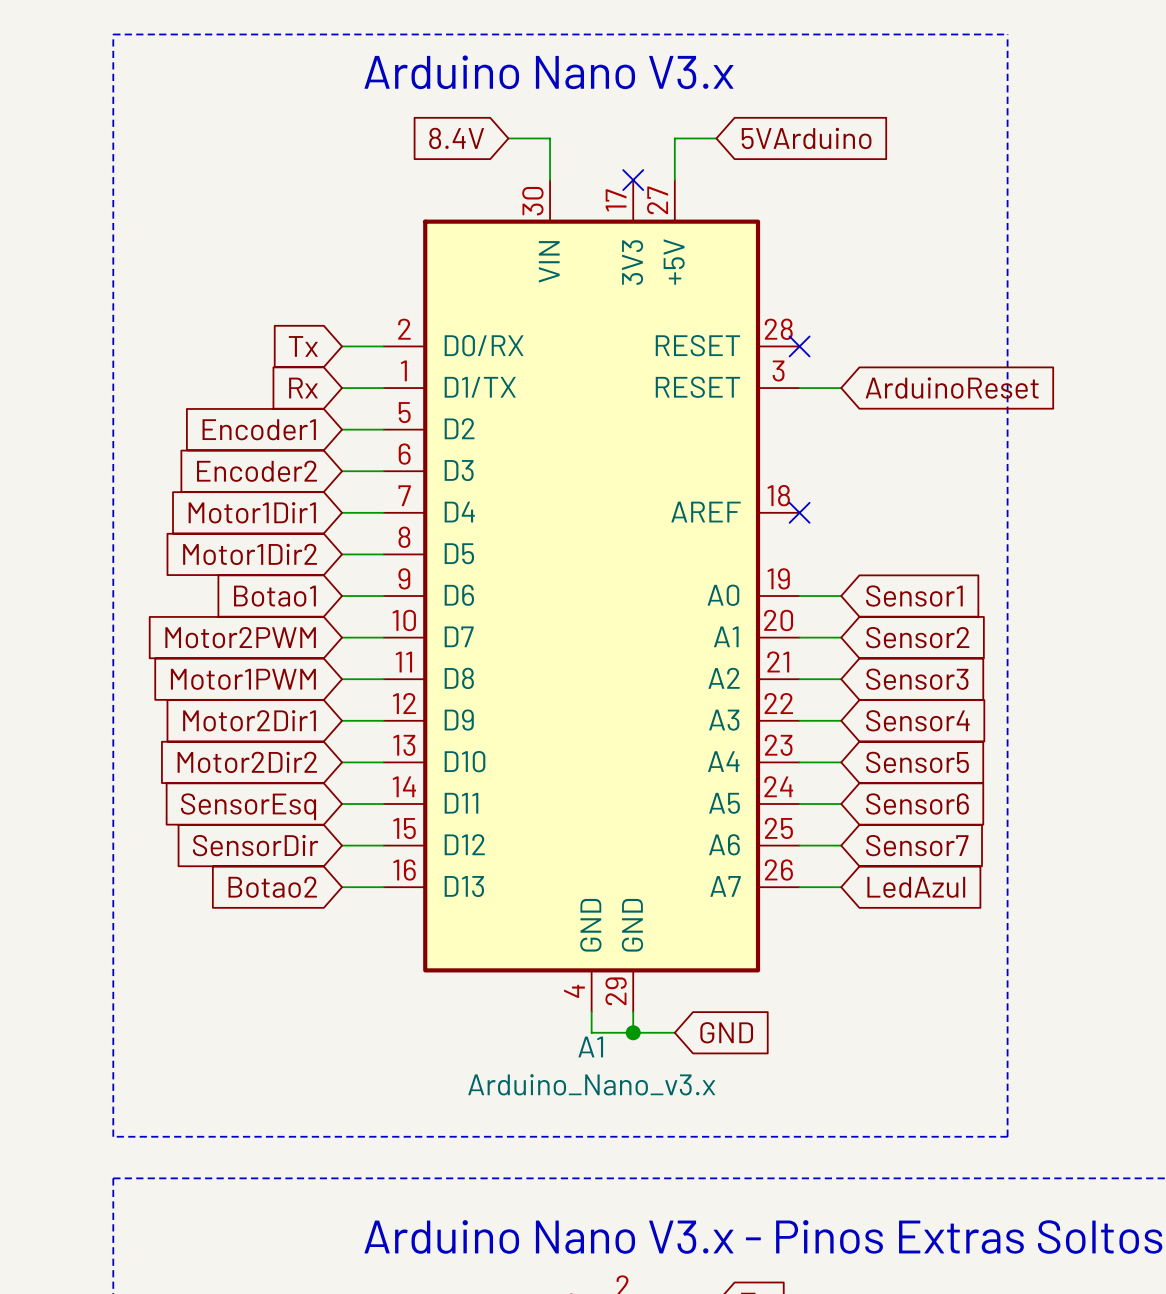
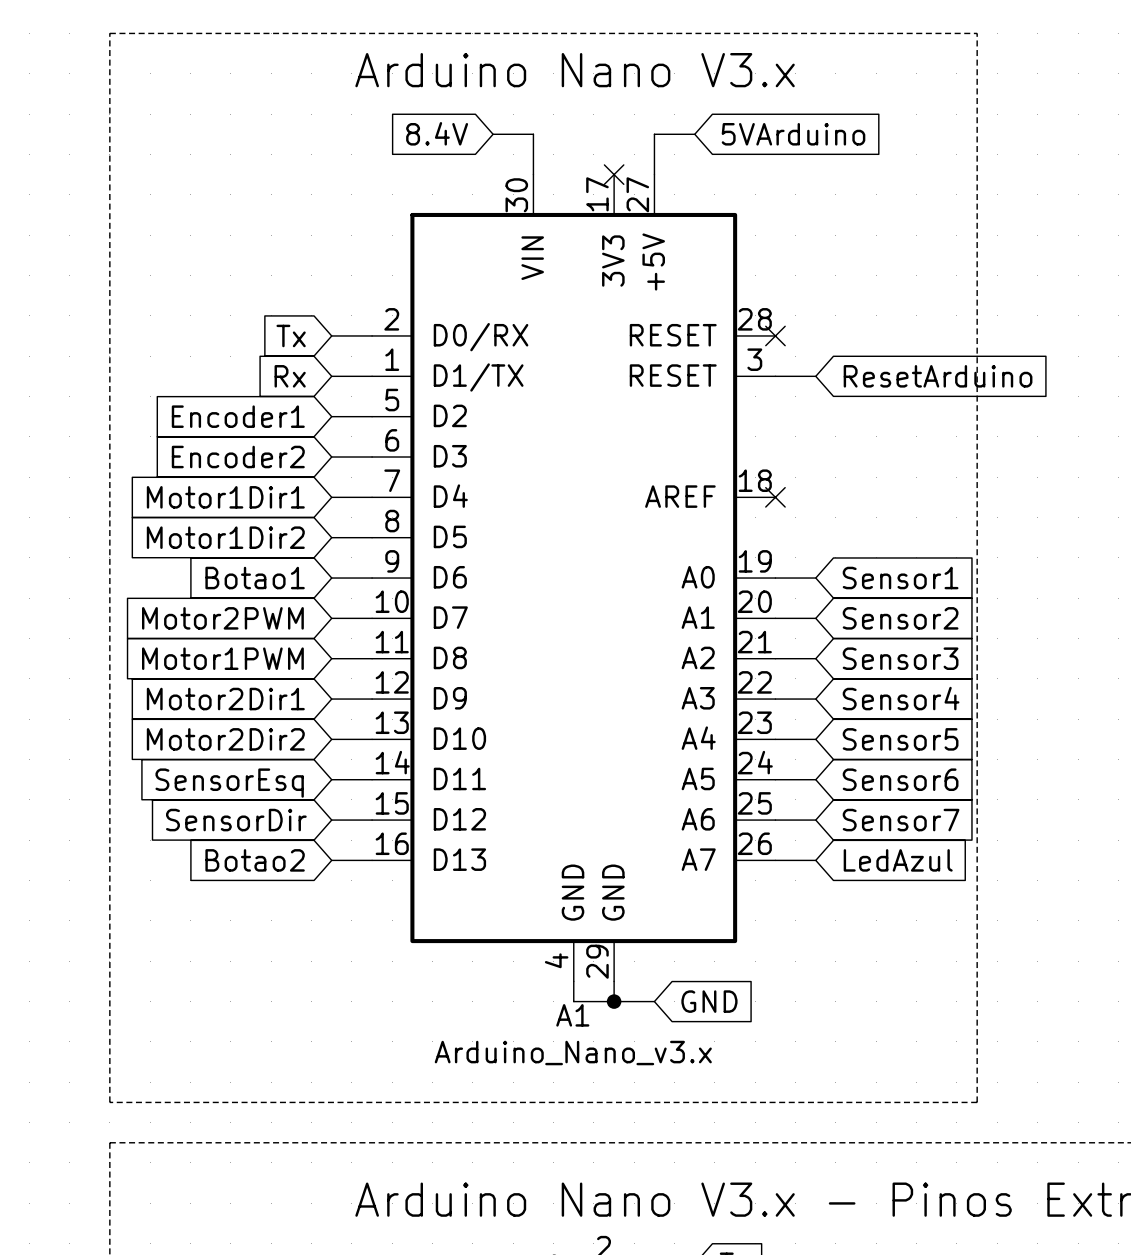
global label: ArduinoReset (952, 388) -> ResetArduino (938, 376)

